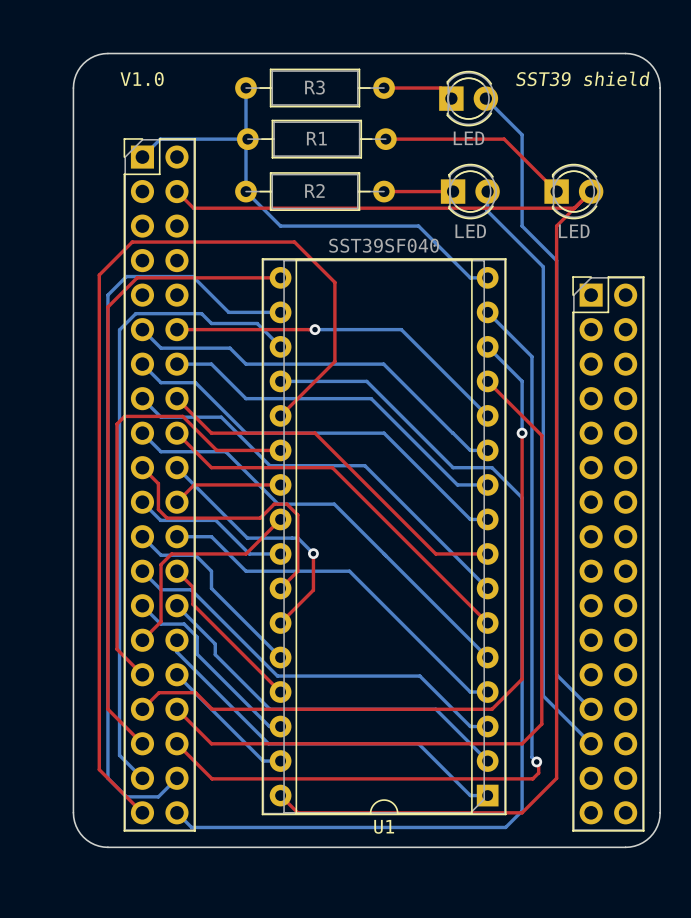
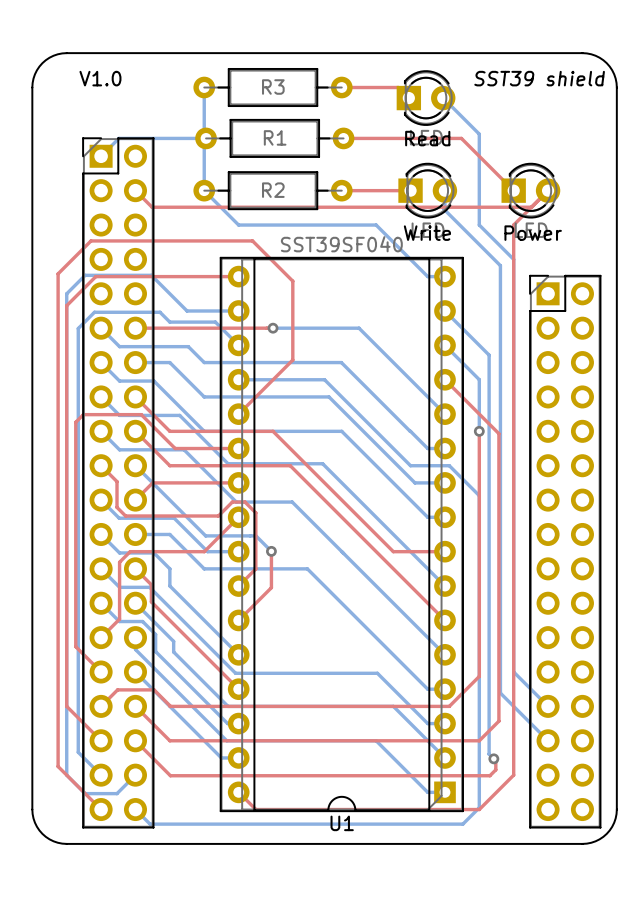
text: none -> Read (427, 138)
text: none -> Write (427, 233)
text: none -> Power (533, 233)

